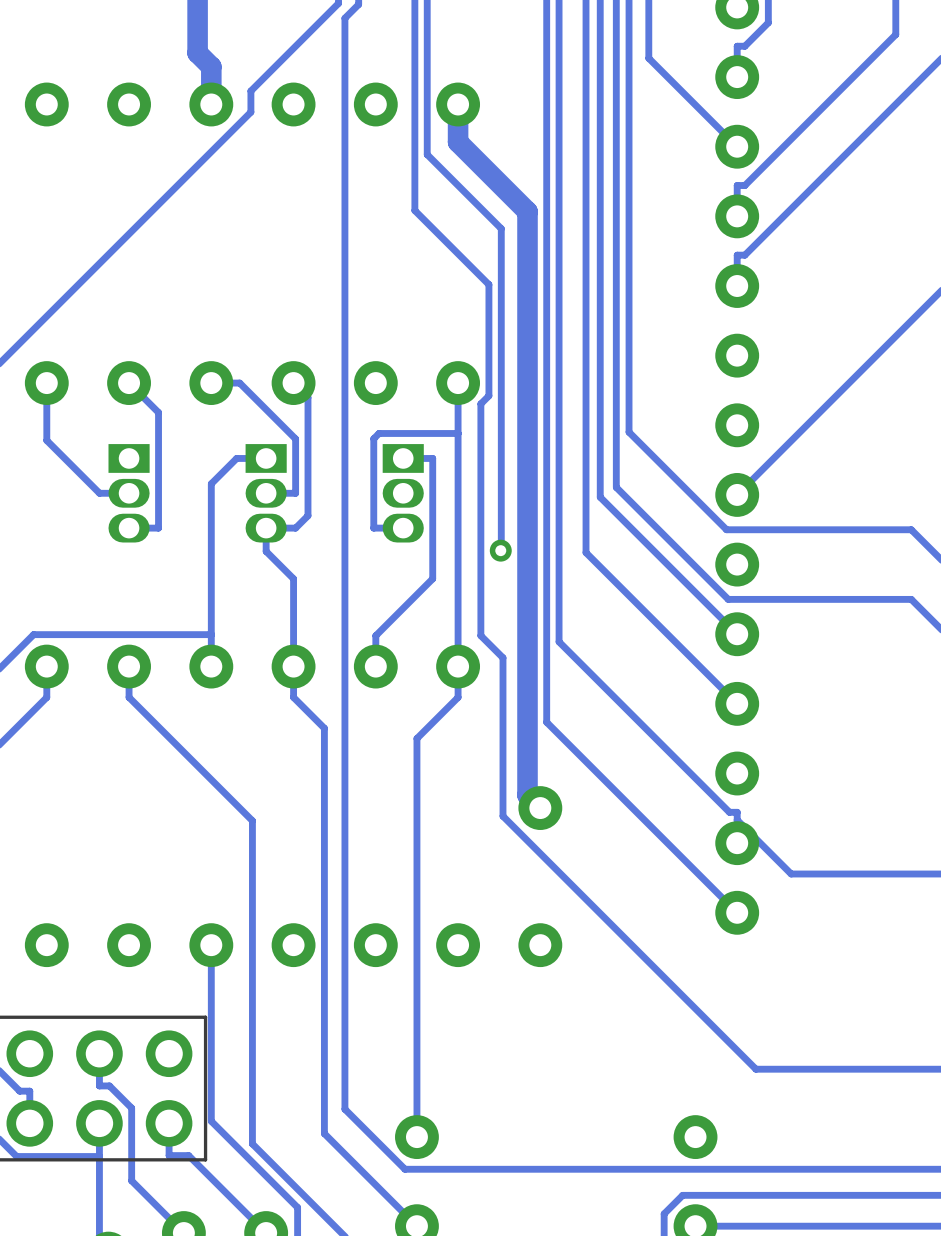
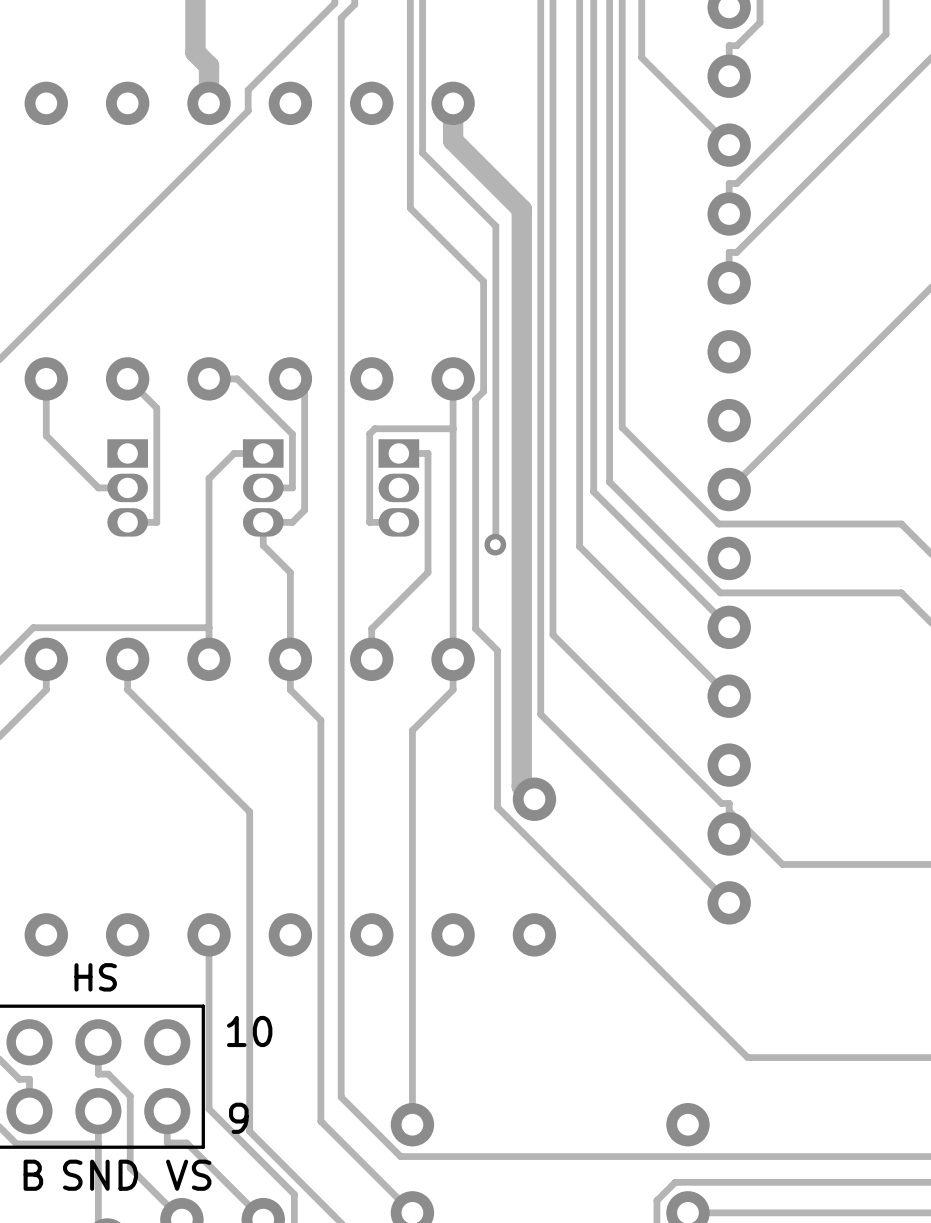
text: none -> HS (95, 977)
text: none -> 10 (249, 1031)
text: none -> 9 (238, 1118)
text: none -> B (33, 1175)
text: none -> SND (100, 1175)
text: none -> VS (188, 1175)

